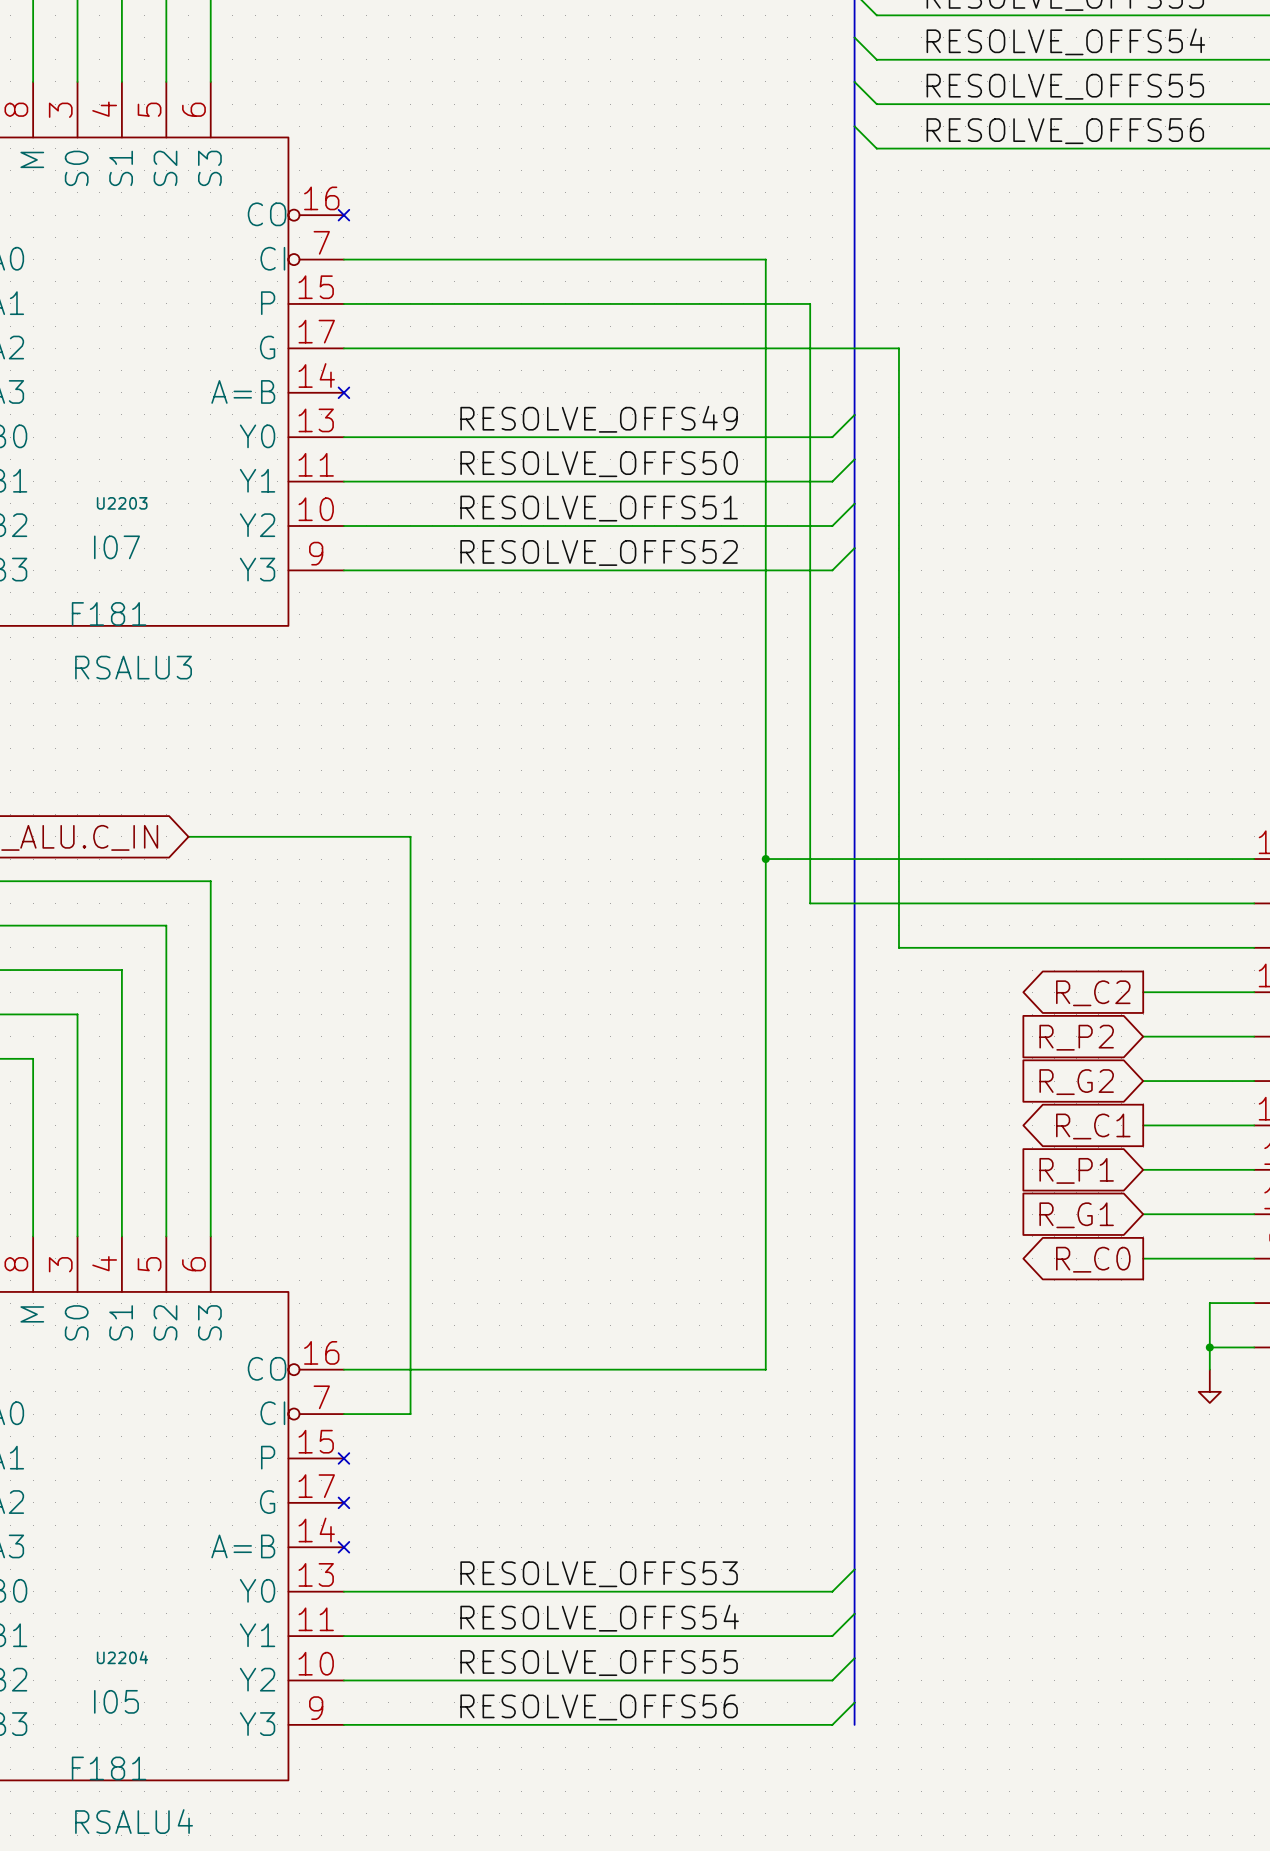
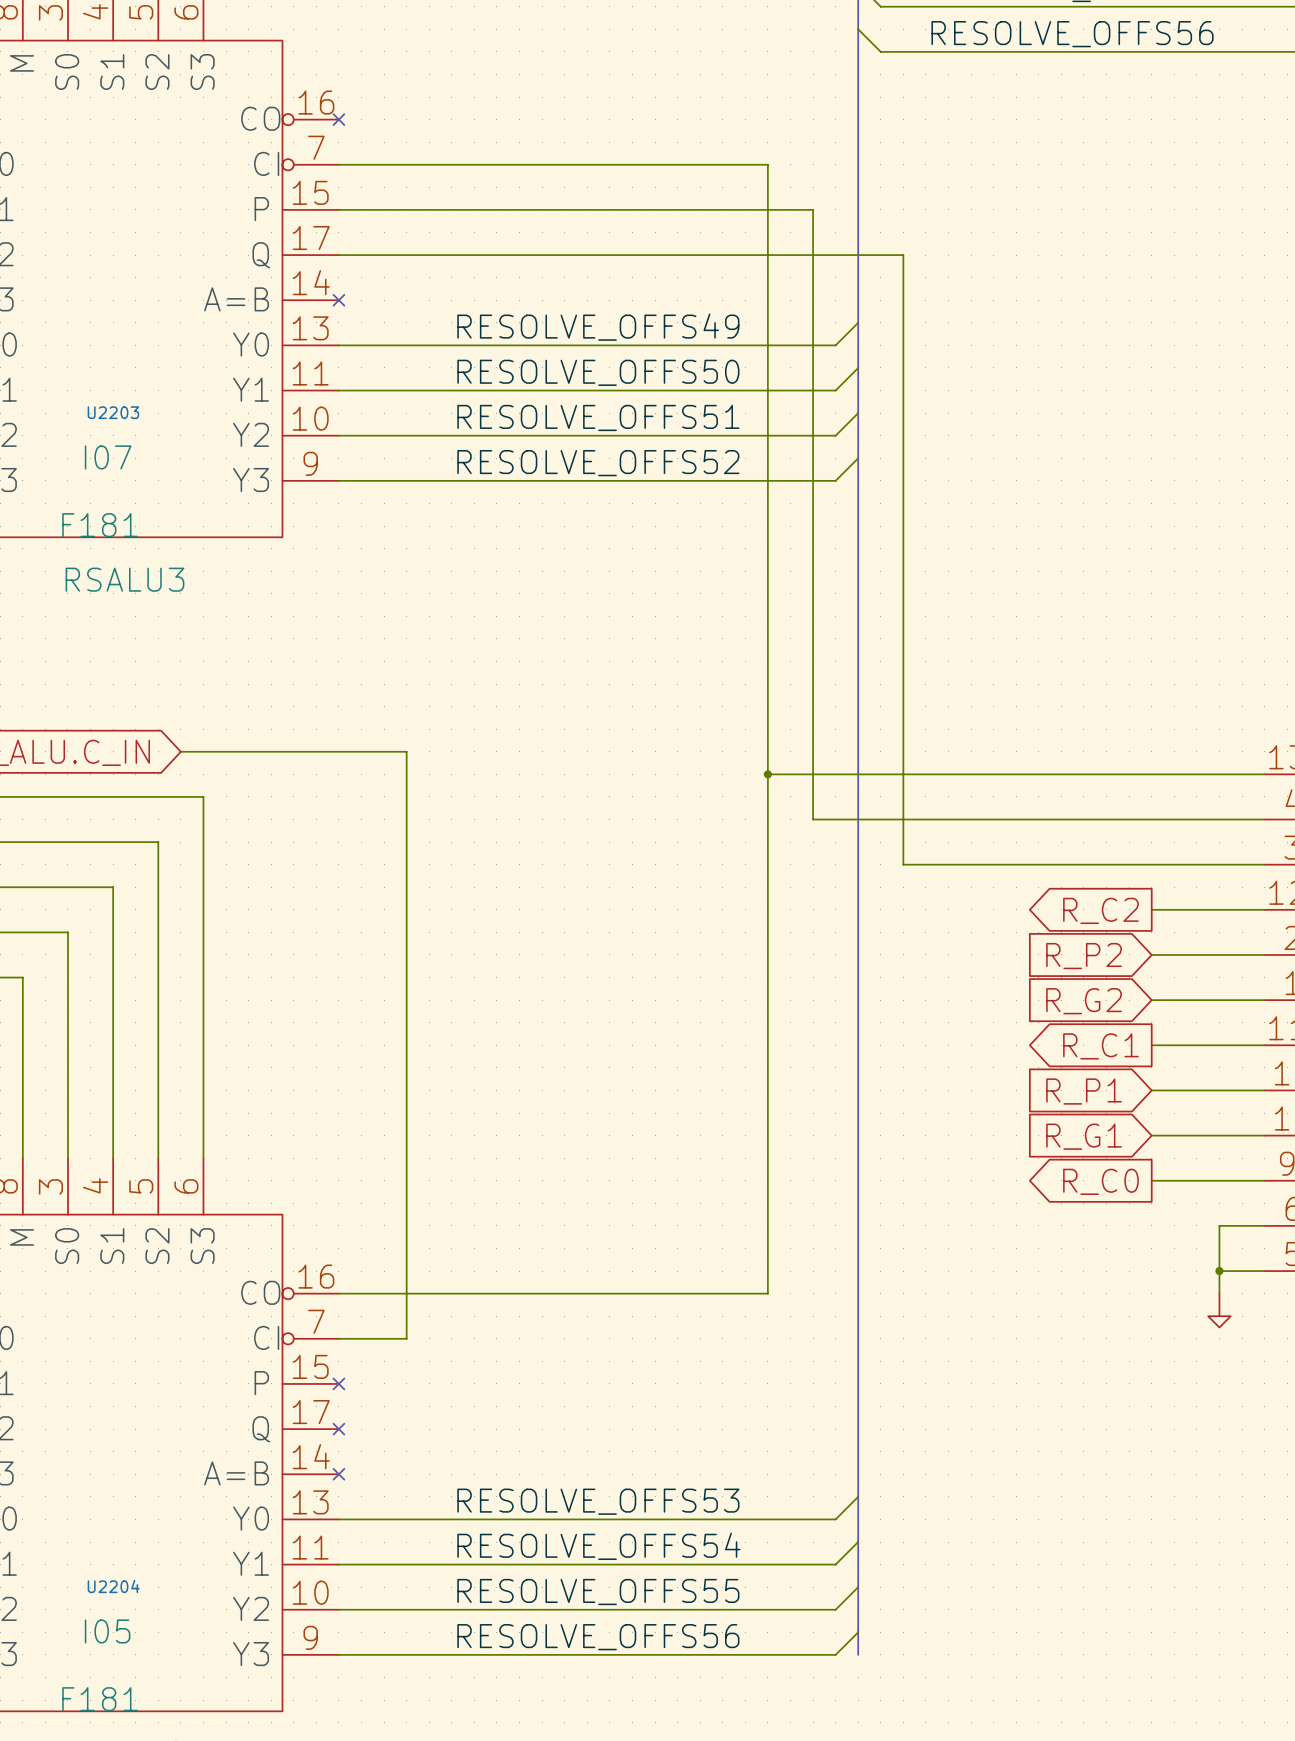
U2203 pin name: G (267, 347) -> Q (261, 255)
U2204 pin name: G (267, 1502) -> Q (261, 1429)

